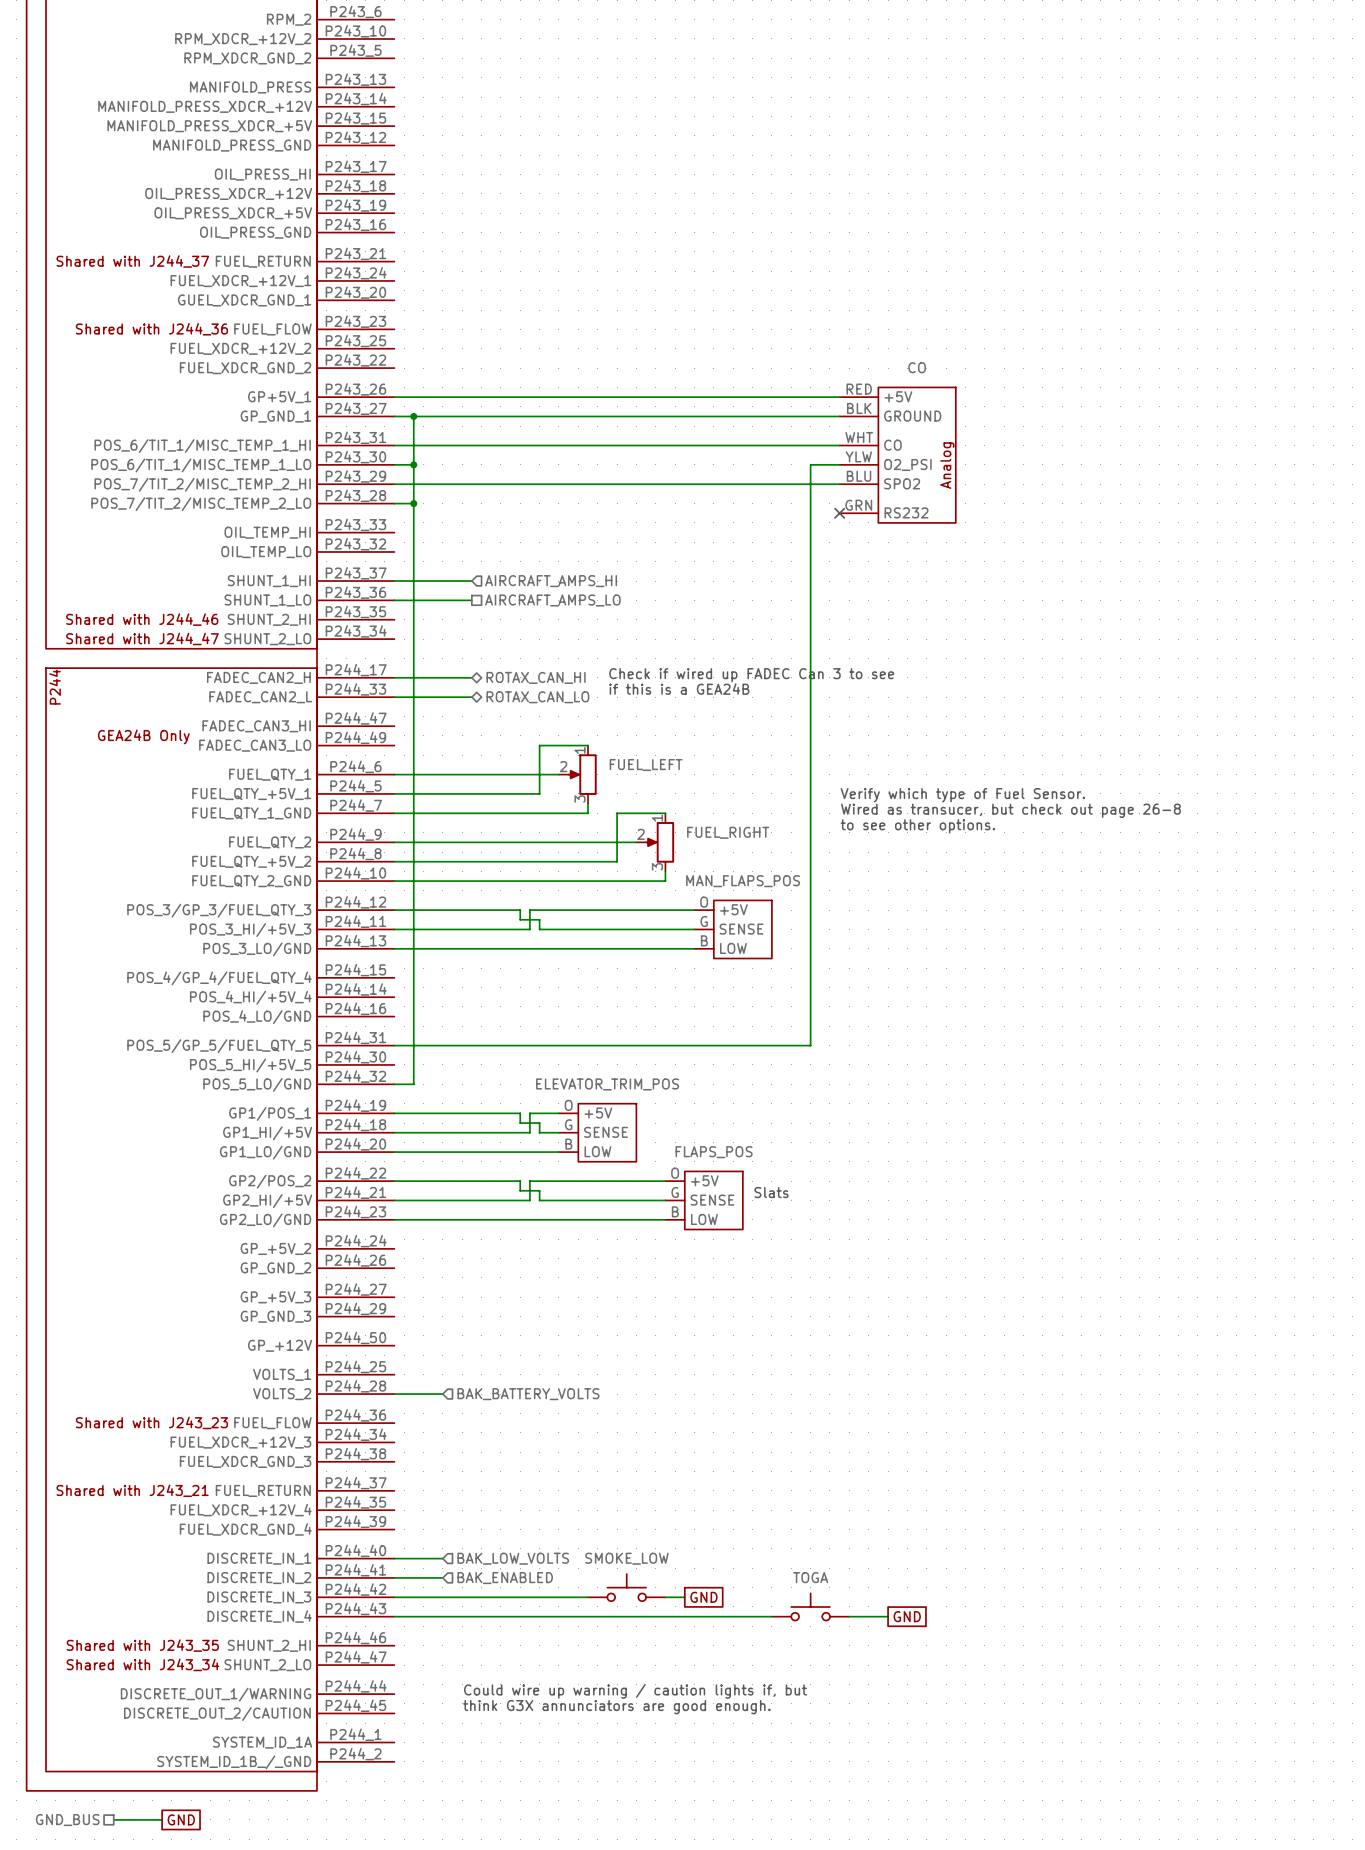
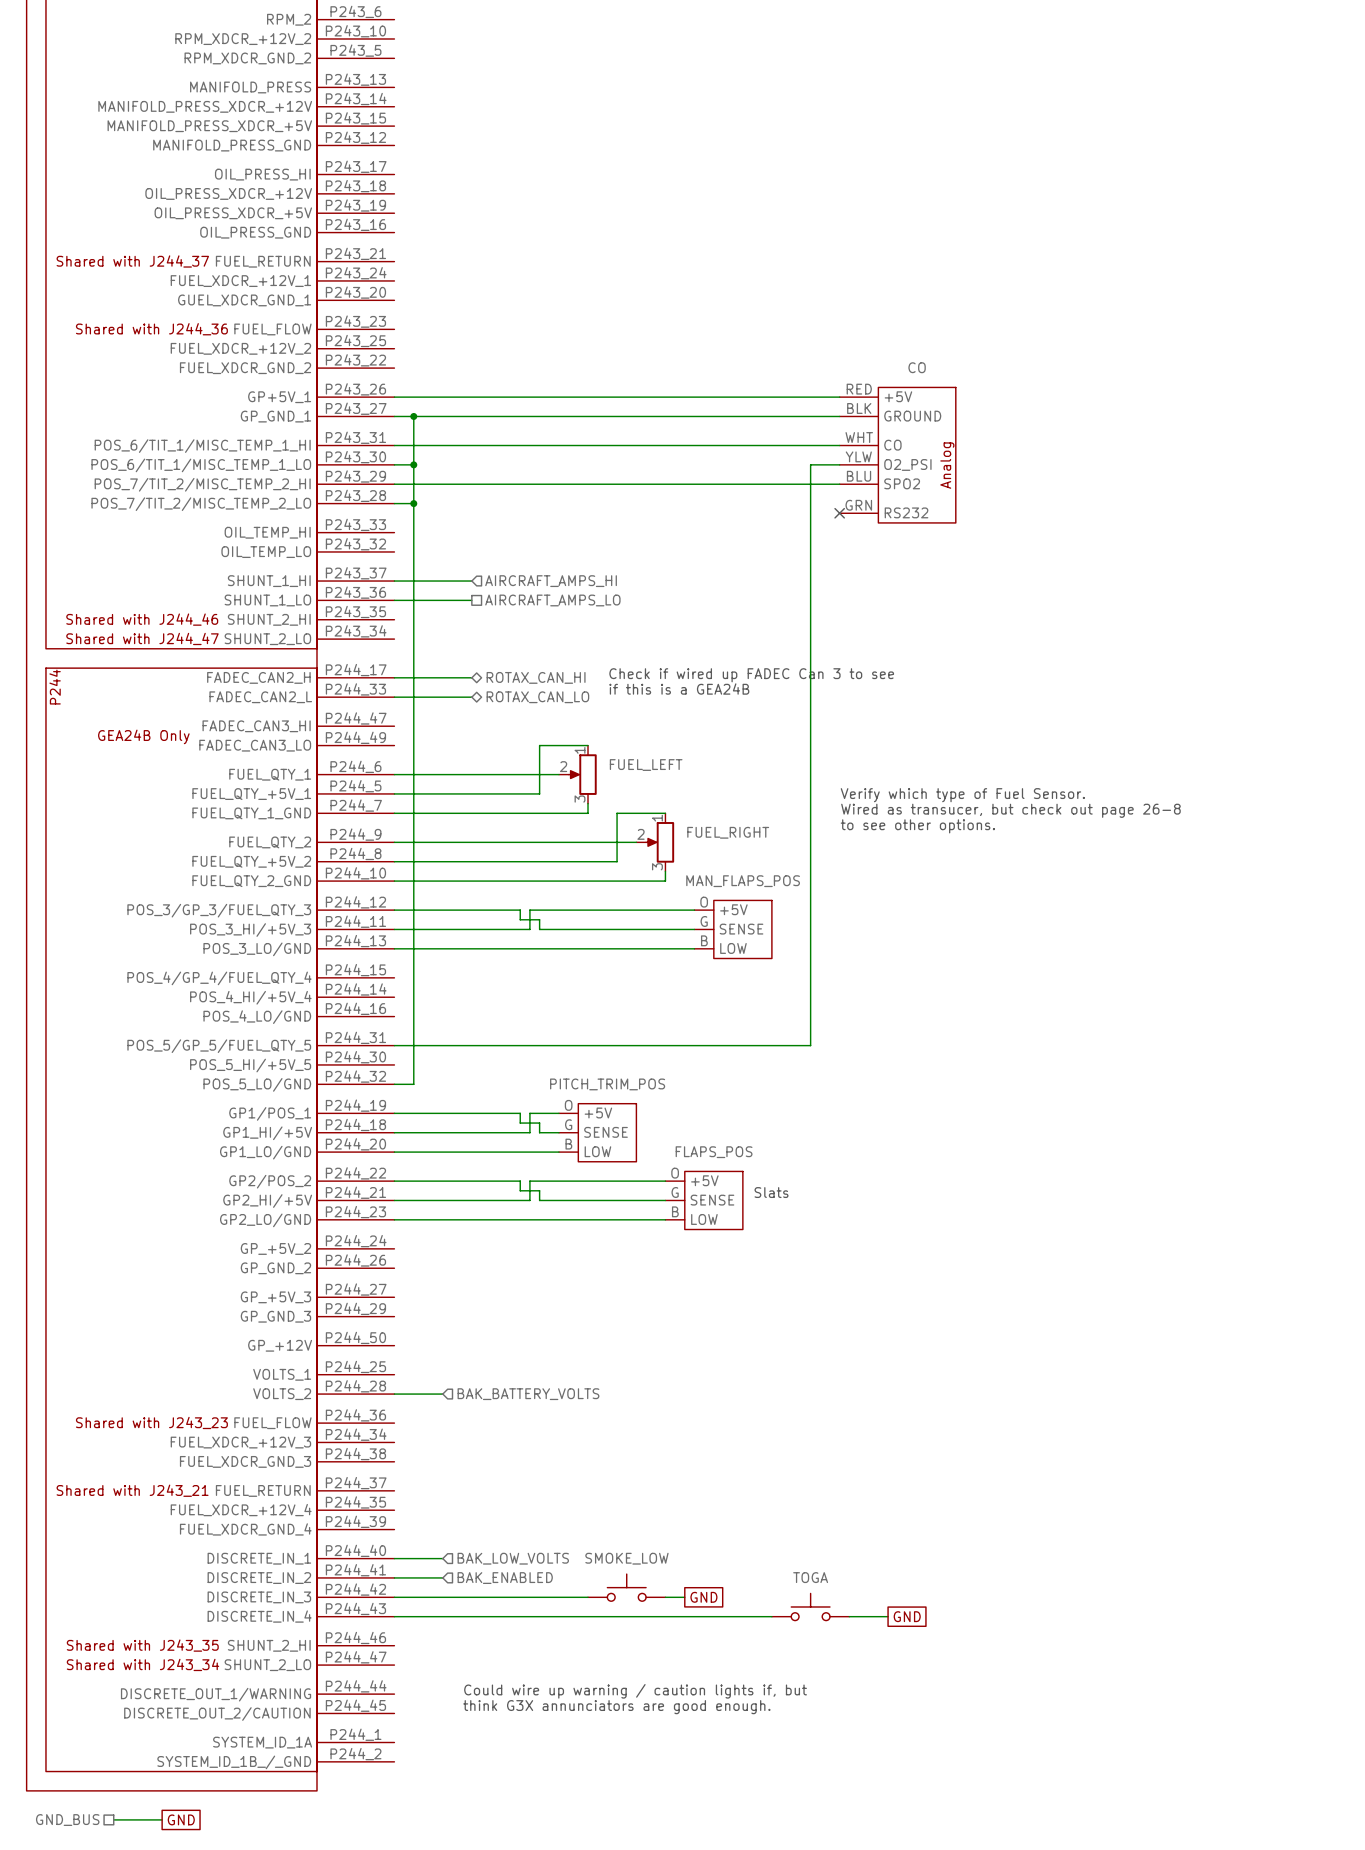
ELEVATOR_TRIM_POS name: ELEVATOR_TRIM_POS (607, 1084) -> PITCH_TRIM_POS (607, 1084)

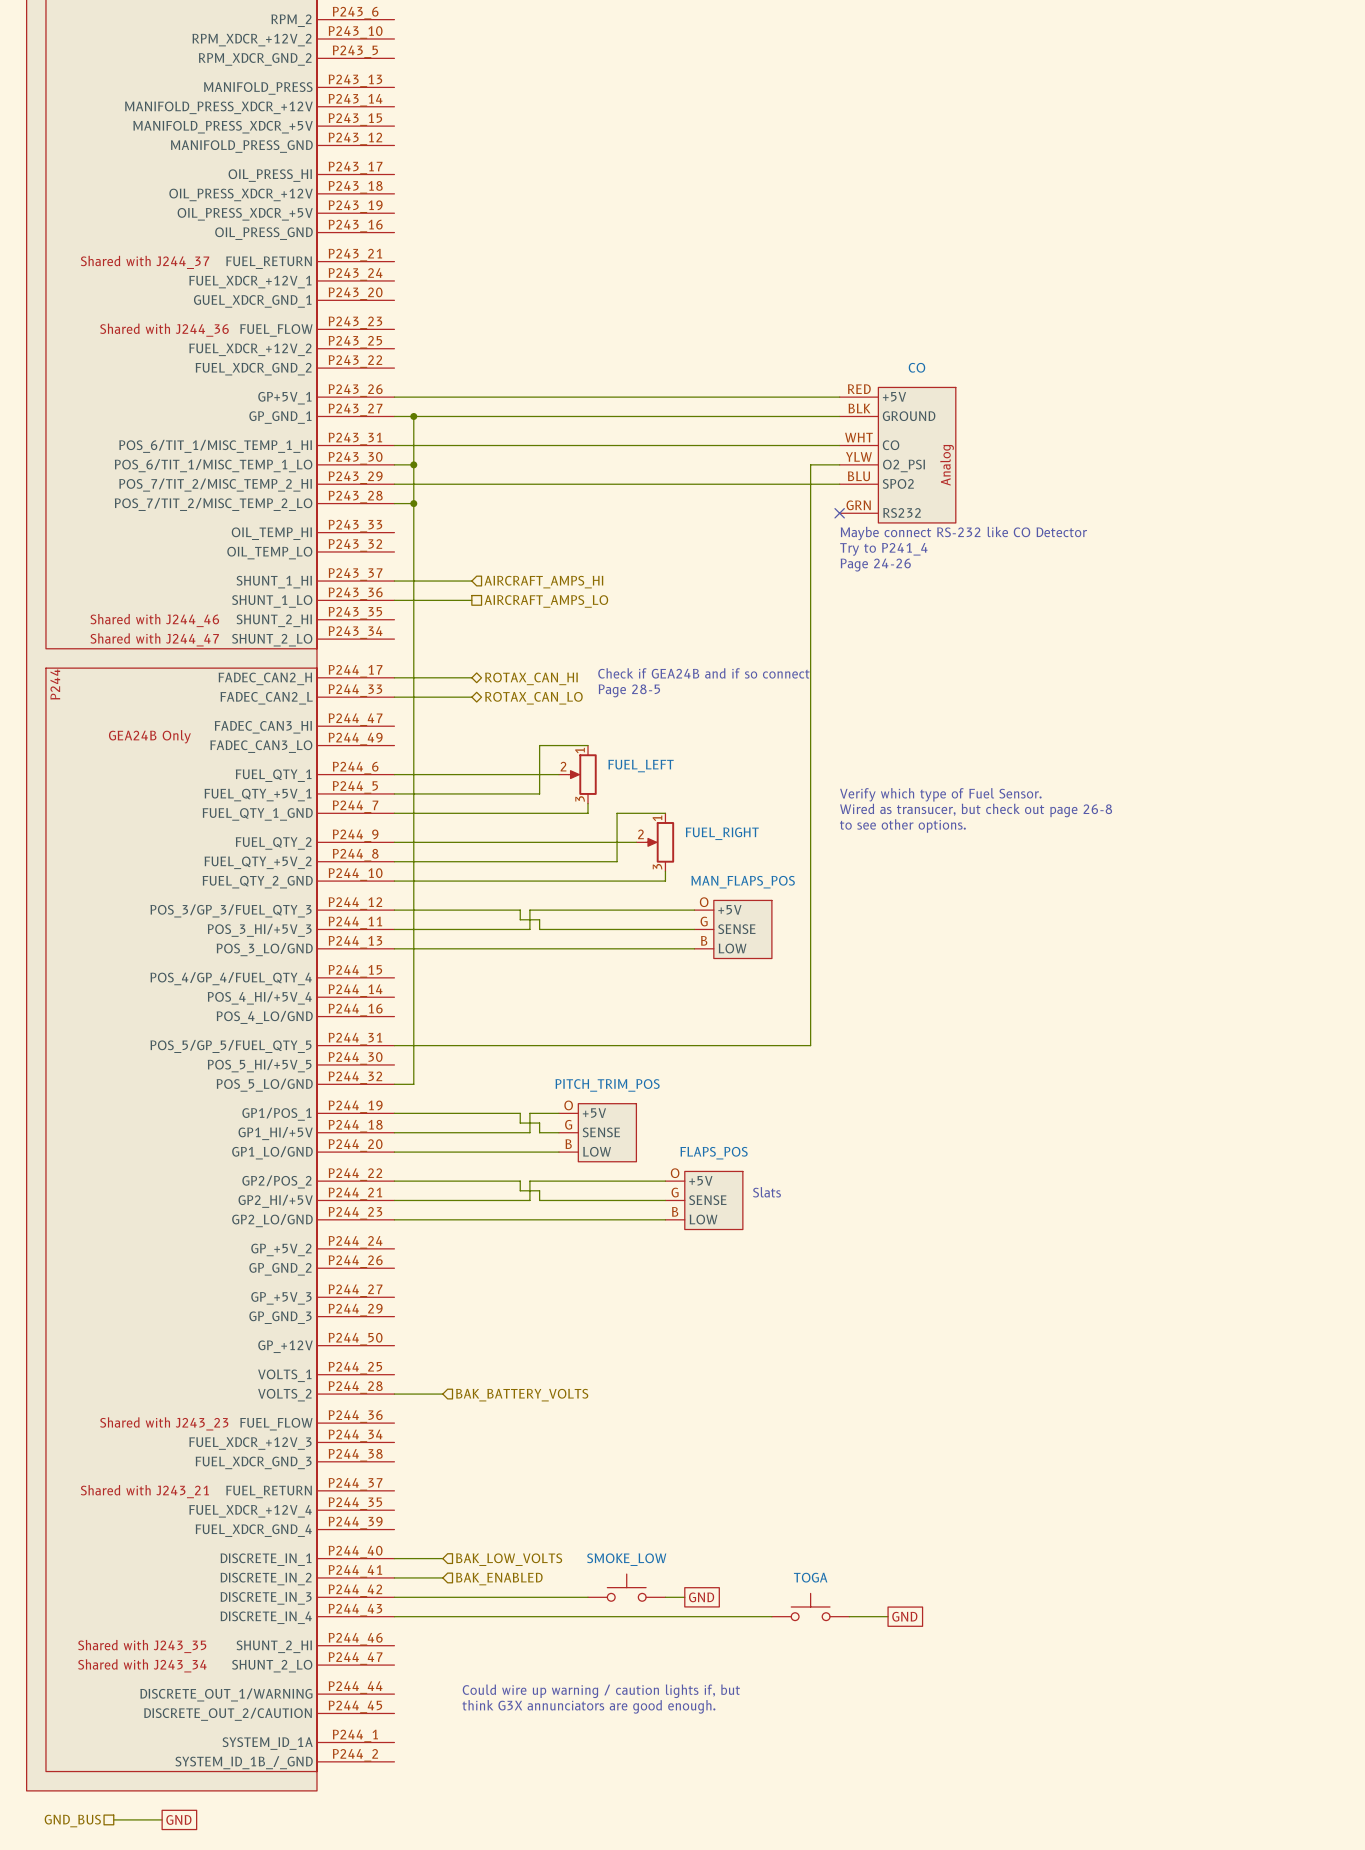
text: none -> Maybe connect RS-232 like CO Detector (963, 533)
text: none -> Try to P241_4 (883, 549)
text: none -> Page 24-26 (875, 565)
text: none -> Check if GEA24B and if so connect (703, 673)
text: Check if wired up FADEC Can 3 to see (751, 675) -> none
text: if this is a GEA24B (679, 689) -> none
text: none -> Page 28-5 (629, 690)

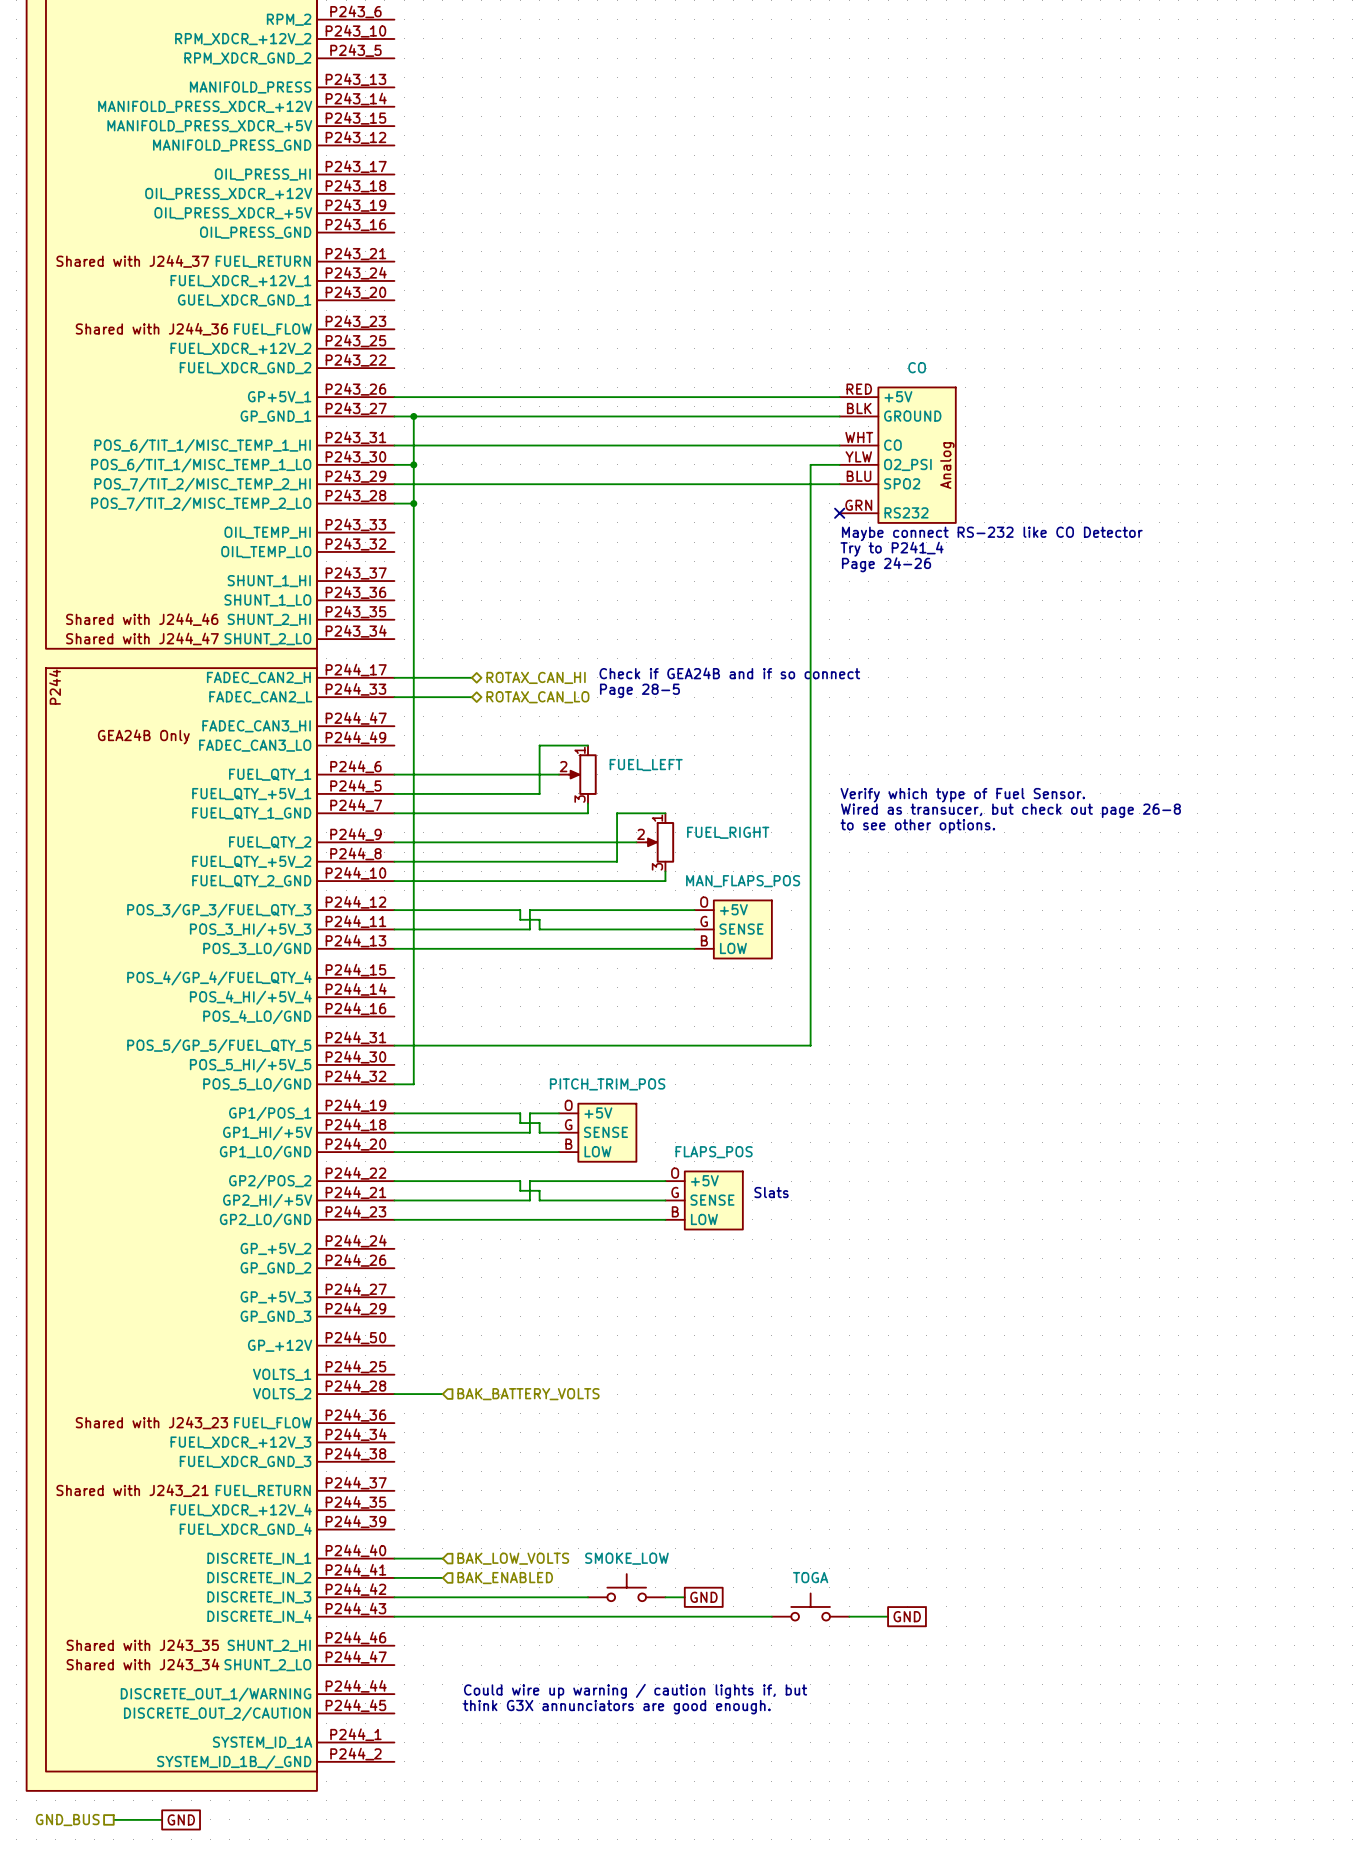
wire: (394, 581) (471, 581) -> none
hierarchical label: AIRCRAFT_AMPS_HI (543, 582) -> none
wire: (394, 600) (471, 600) -> none
hierarchical label: AIRCRAFT_AMPS_LO (546, 601) -> none

